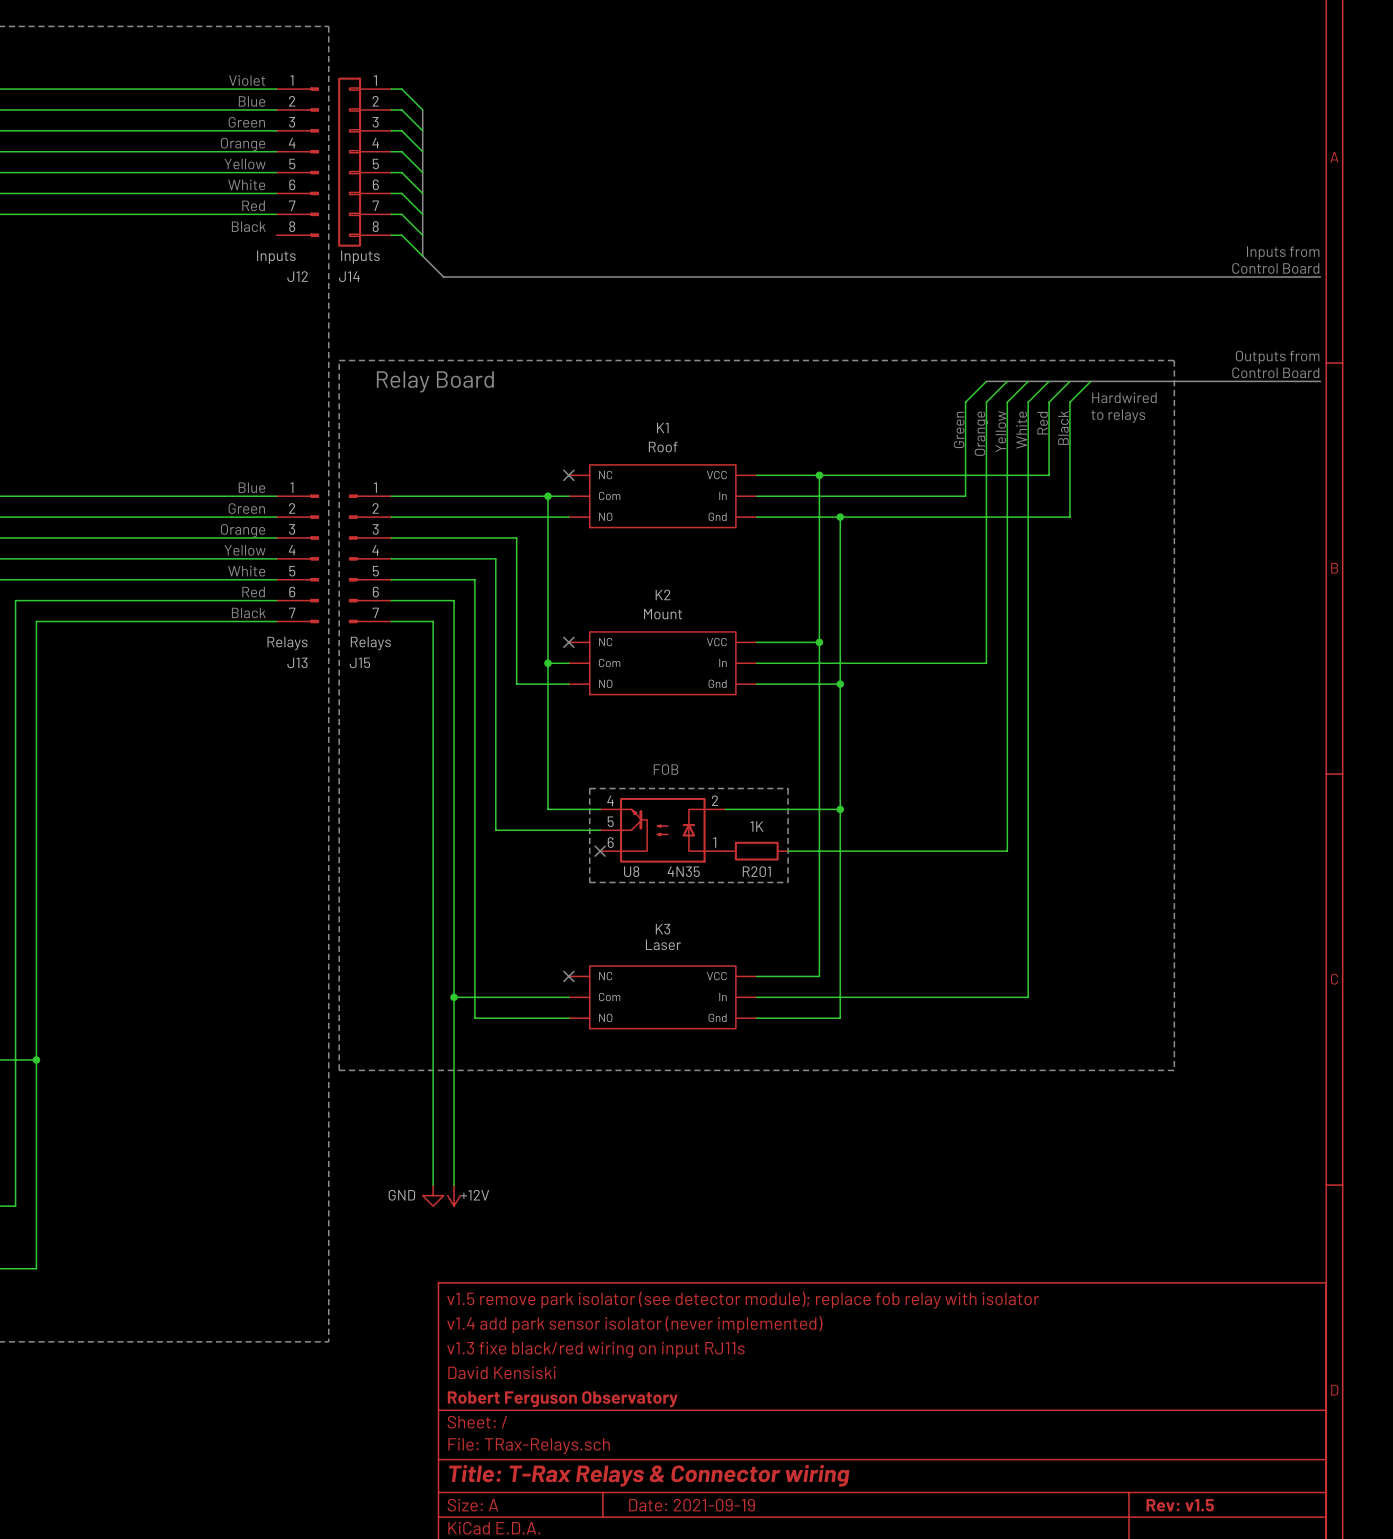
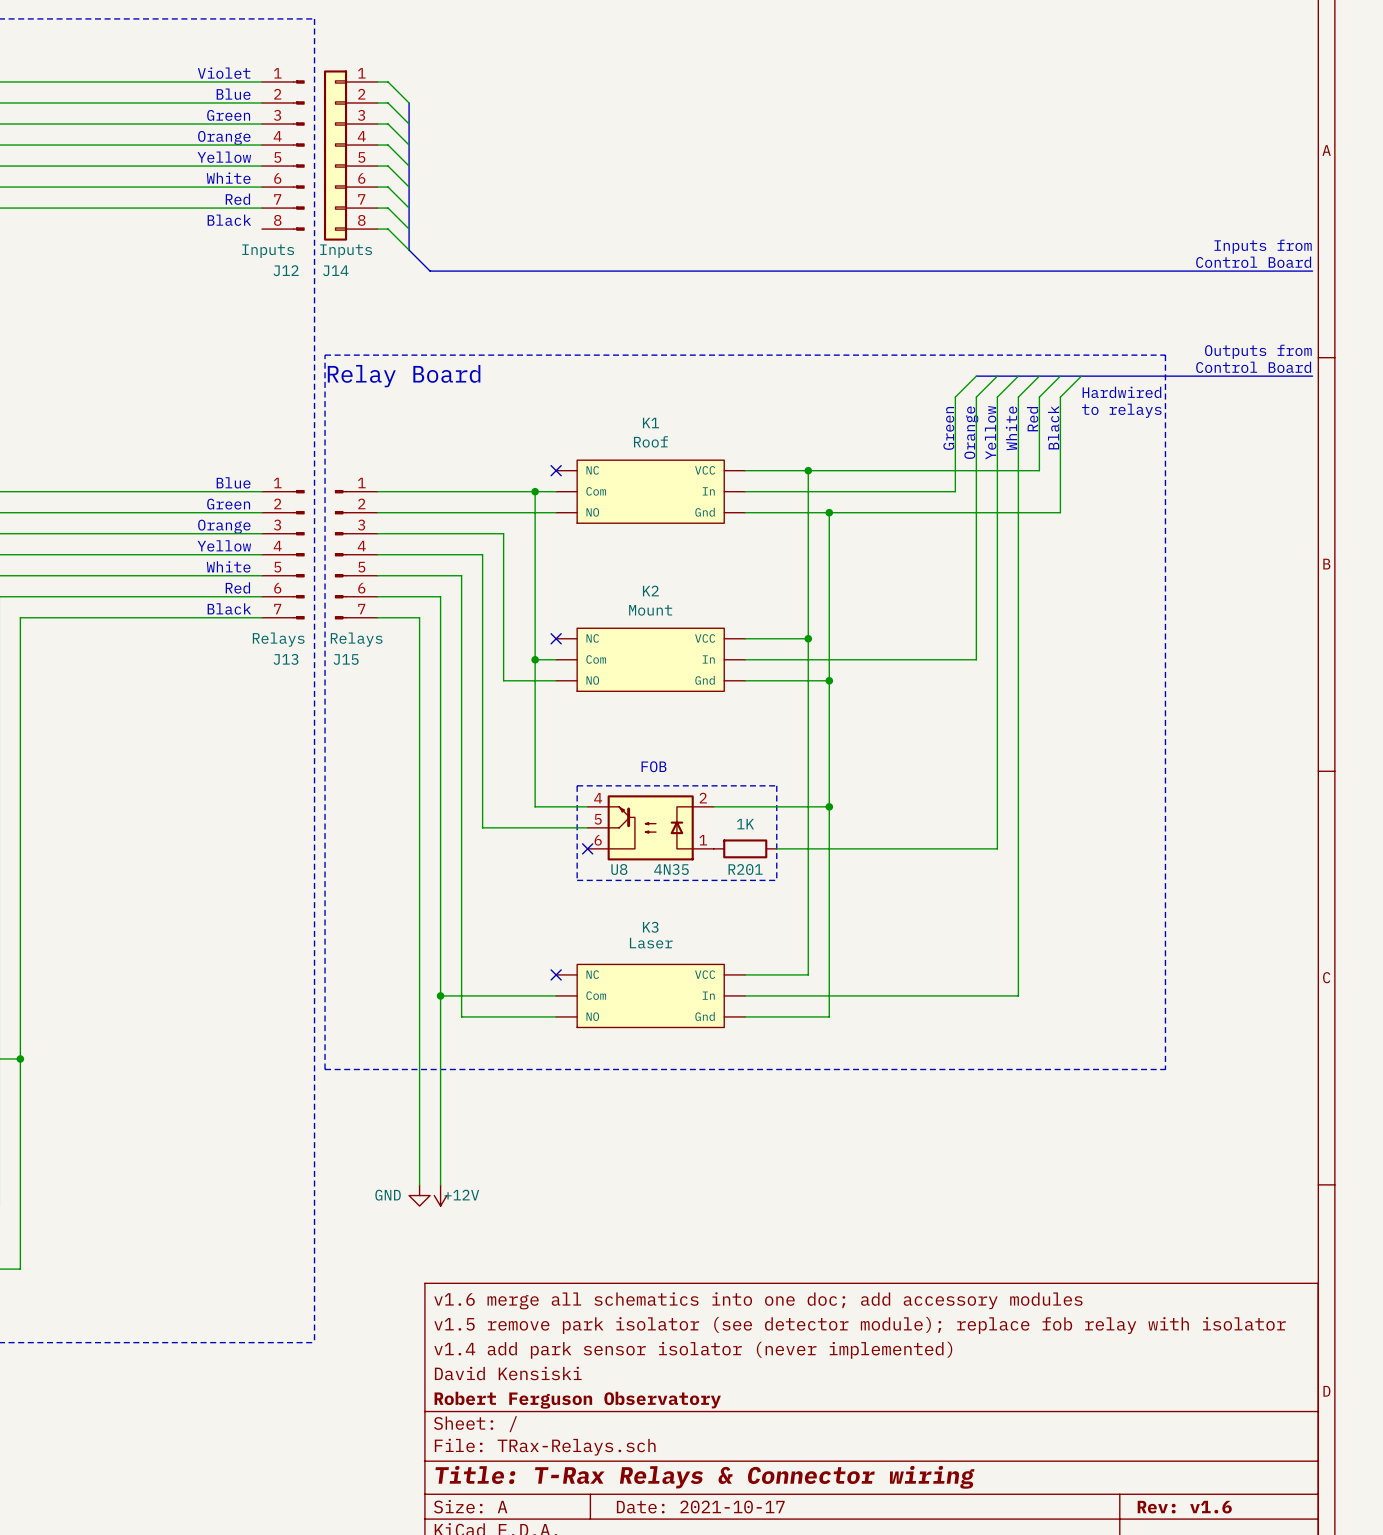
title block: v1.5 remove park isolator (see detector module); replace fob relay with isolator (743, 1300) -> v1.6 merge all schematics into one doc; add accessory modules (758, 1300)
title block: v1.4 add park sensor isolator (never implemented) (634, 1324) -> v1.5 remove park isolator (see detector module); replace fob relay with isolator (860, 1325)
title block: v1.3 fixe black/red wiring on input RJ11s (595, 1349) -> v1.4 add park sensor isolator (never implemented) (693, 1350)
title block: Date: 2021-09-19 (692, 1505) -> Date: 2021-10-17 (700, 1507)
title block: Rev: v1.5 (1180, 1505) -> Rev: v1.6 (1184, 1507)

